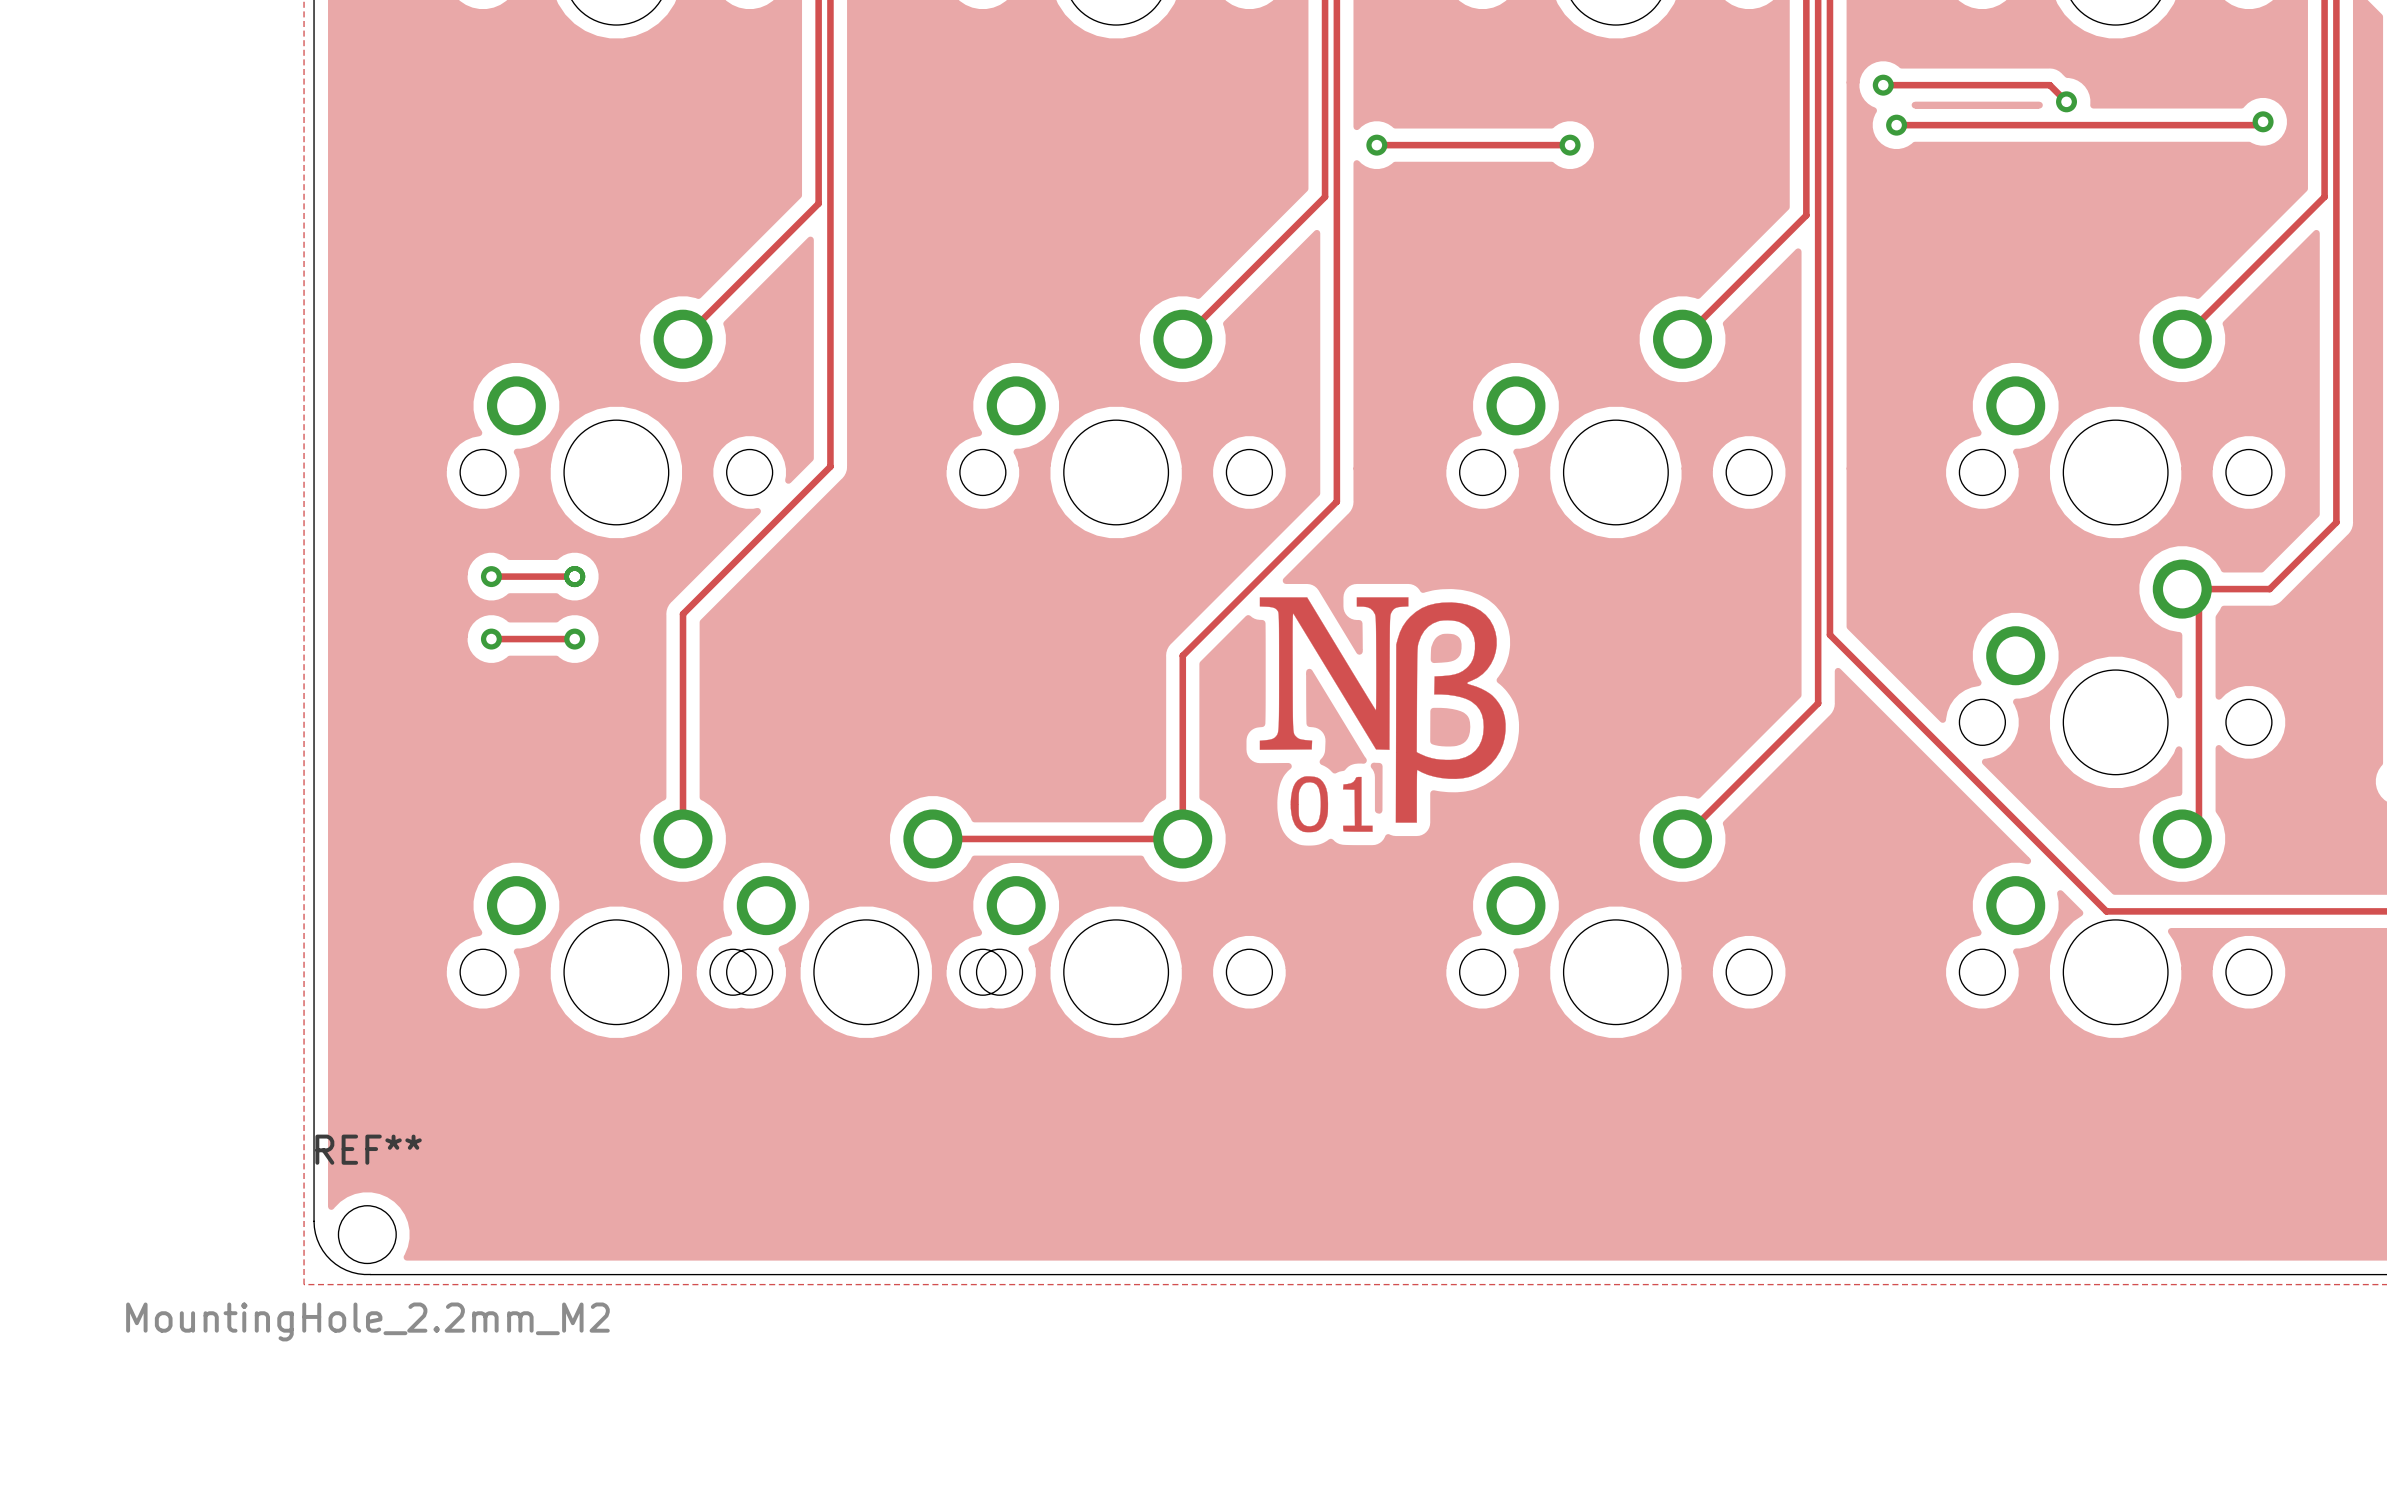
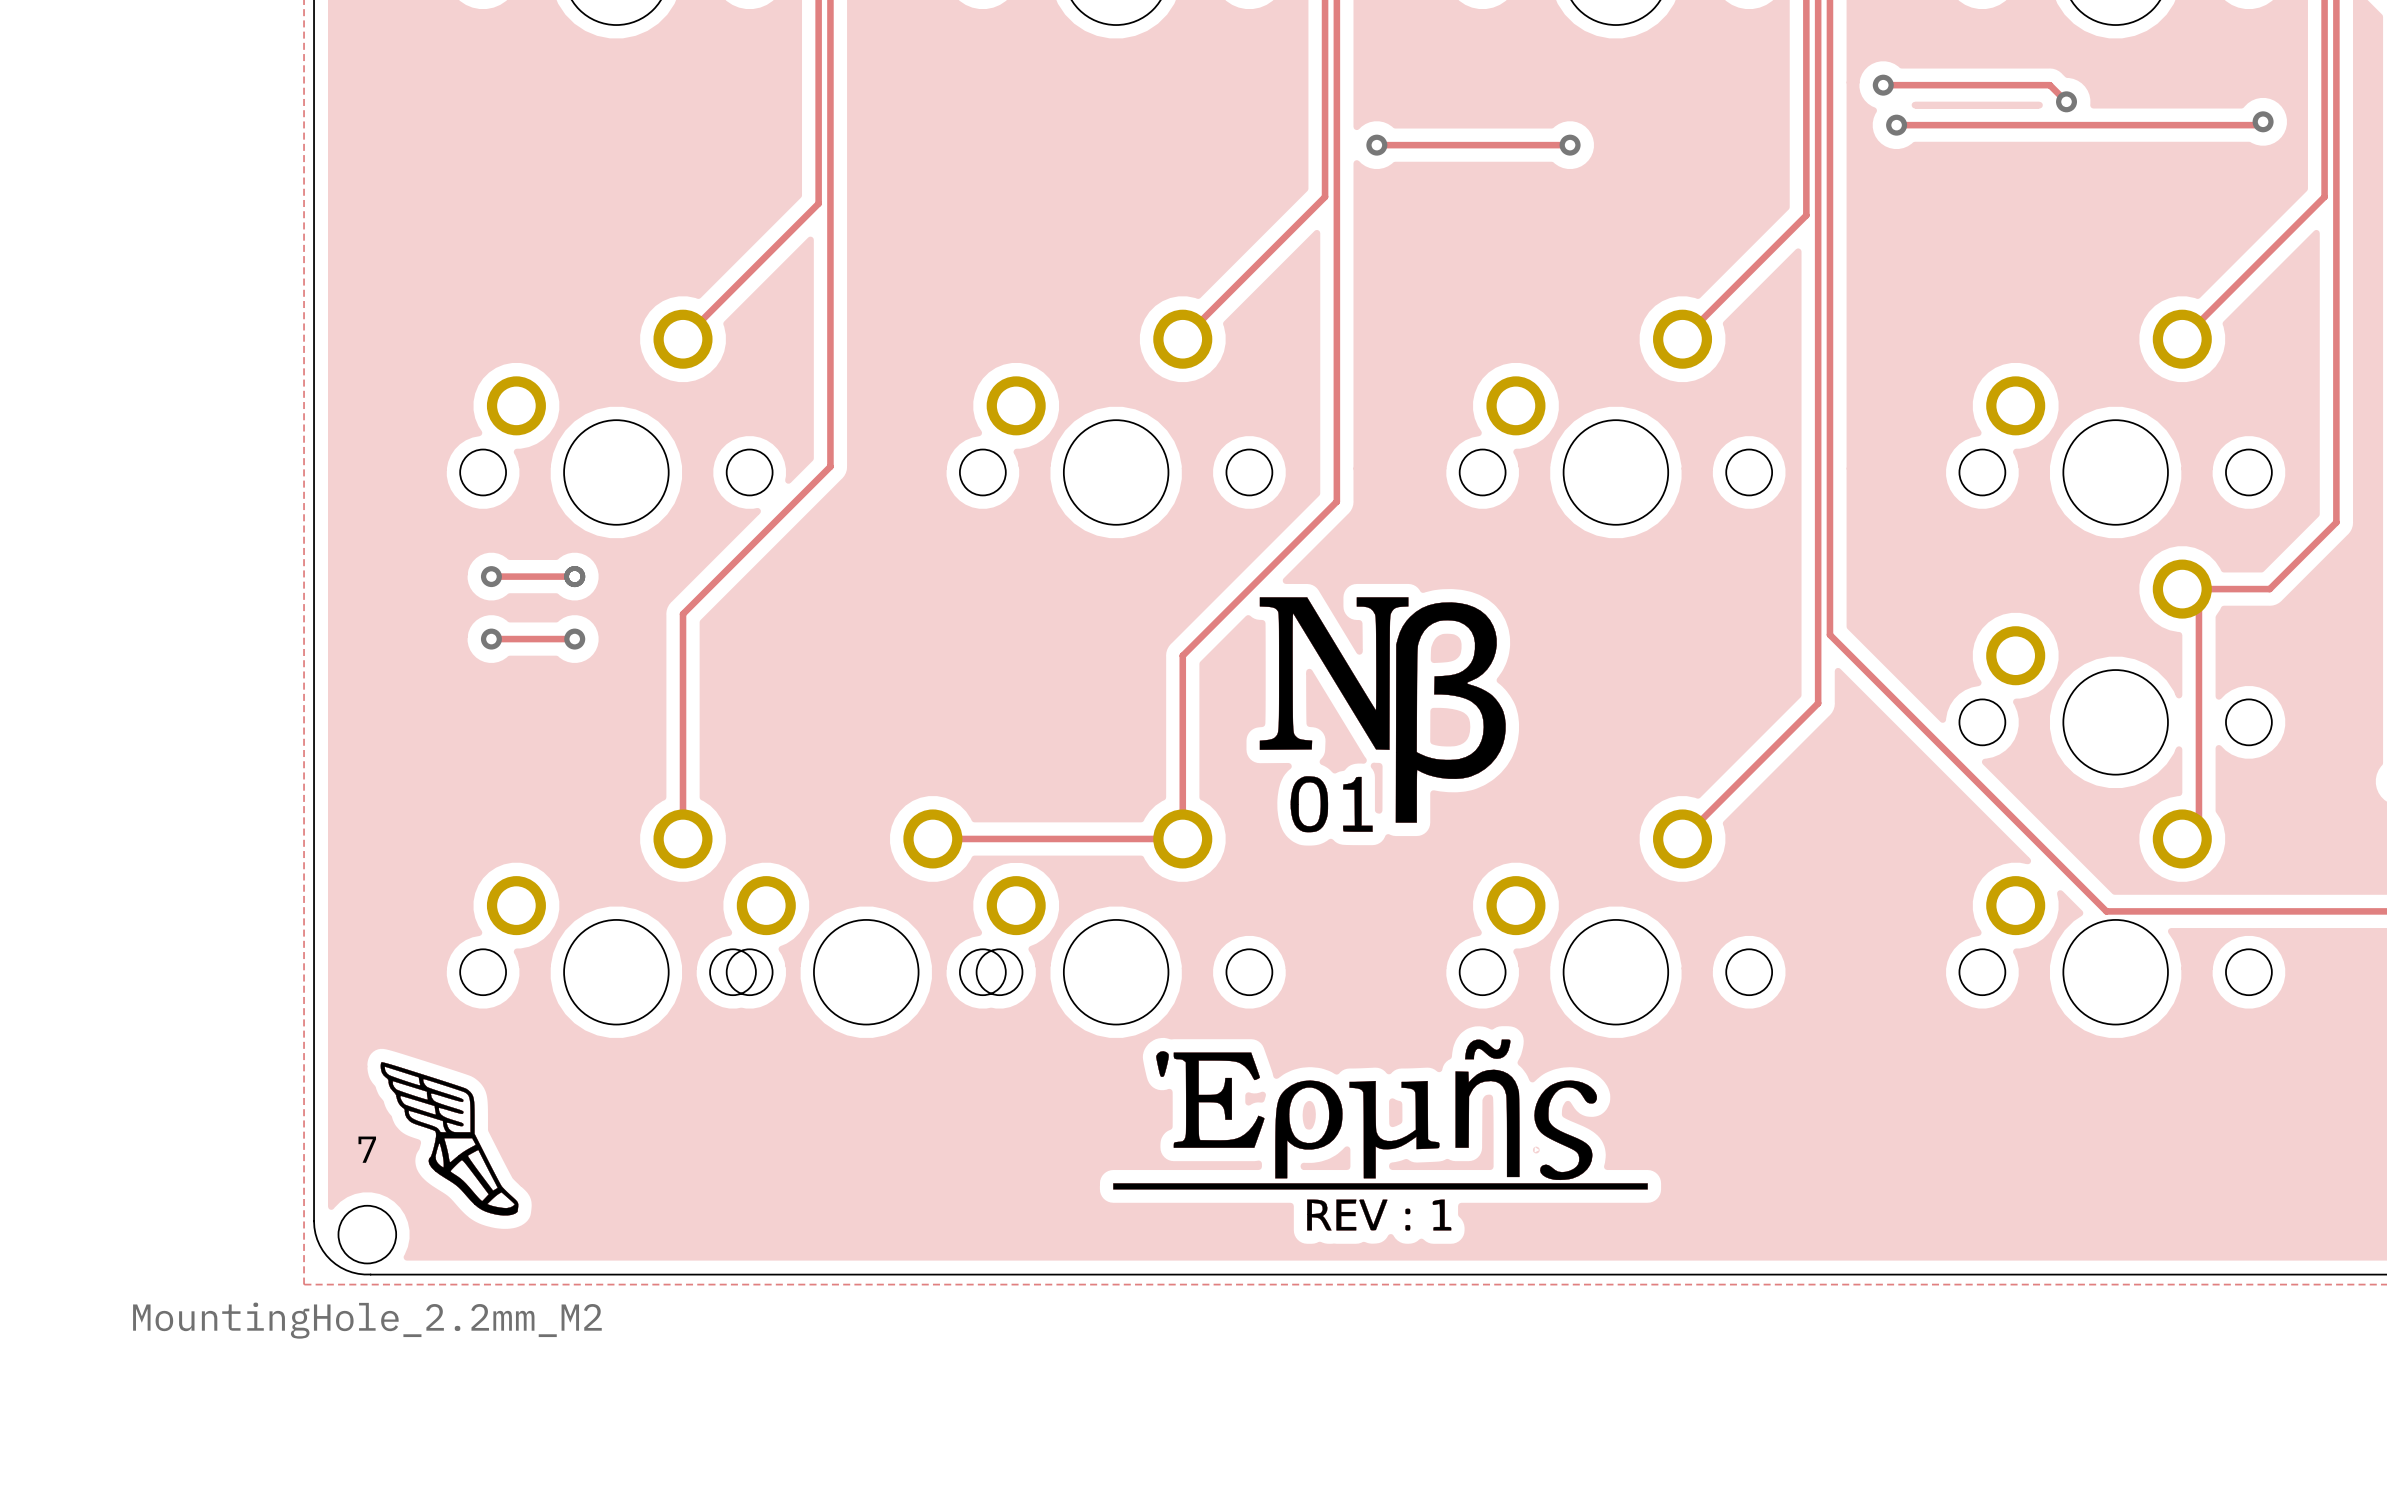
drawing: none -> [1259, 597, 1506, 833]
drawing: none -> [1113, 1039, 1648, 1231]
drawing: none -> [380, 1062, 519, 1216]
REF** name: REF** (368, 1149) -> 7 (367, 1149)

